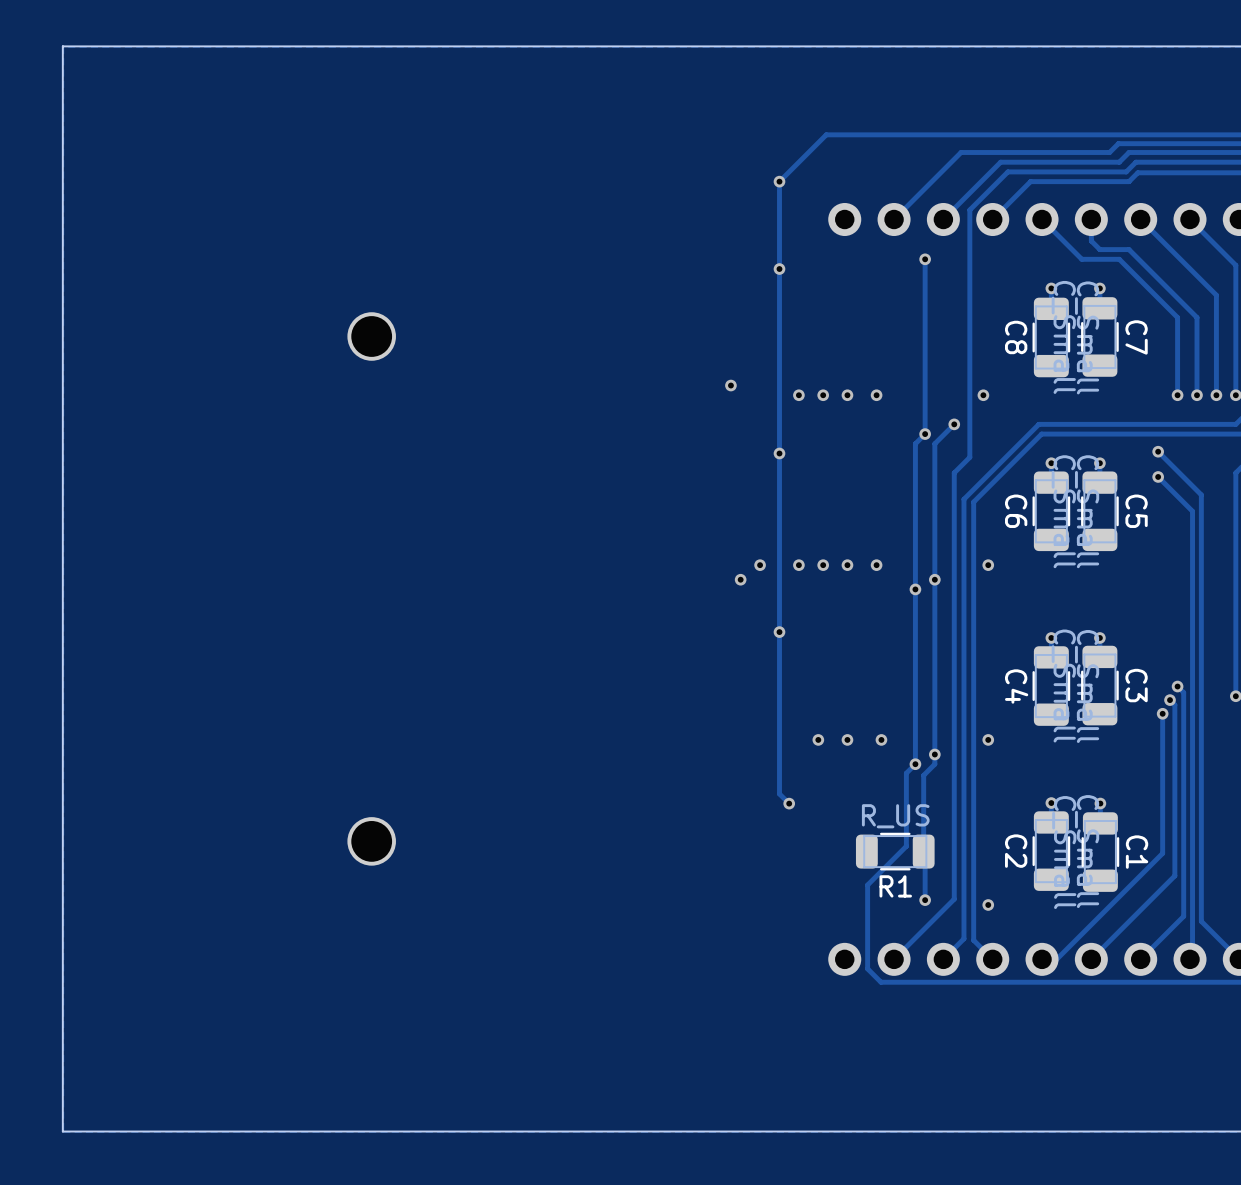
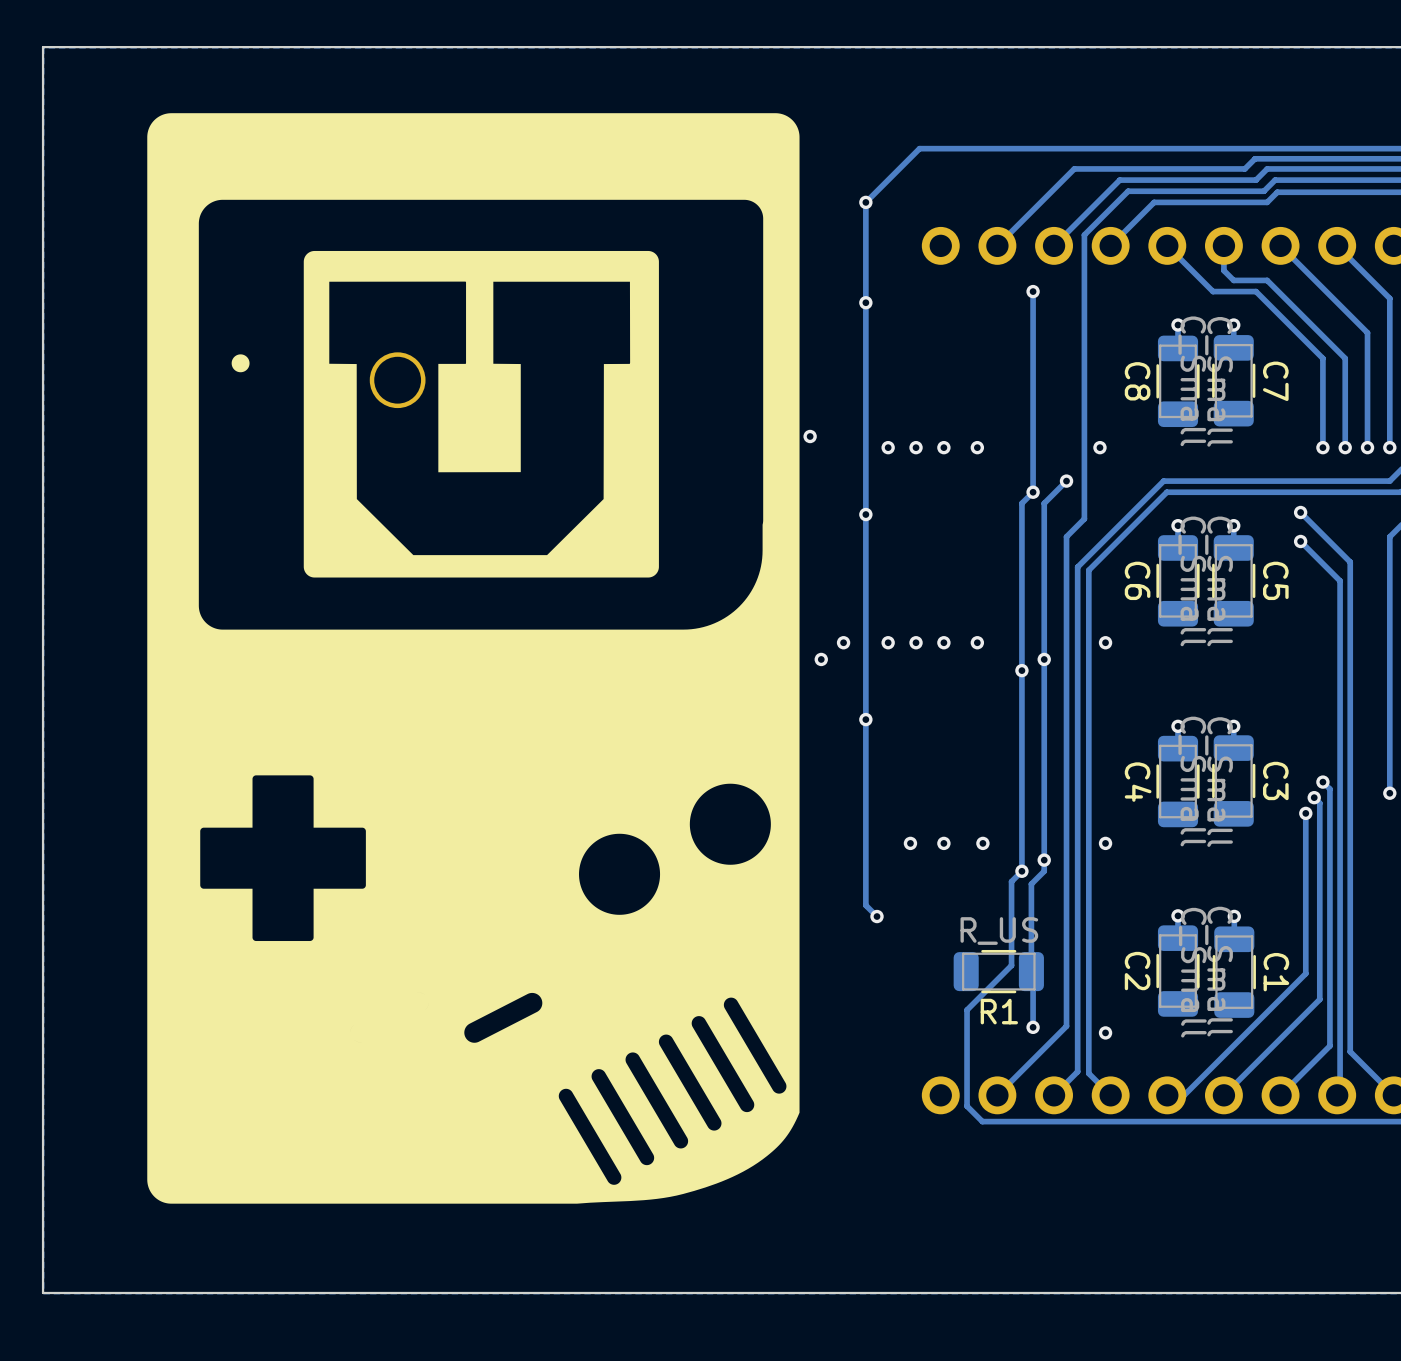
drawing: none -> [147, 113, 800, 1204]

